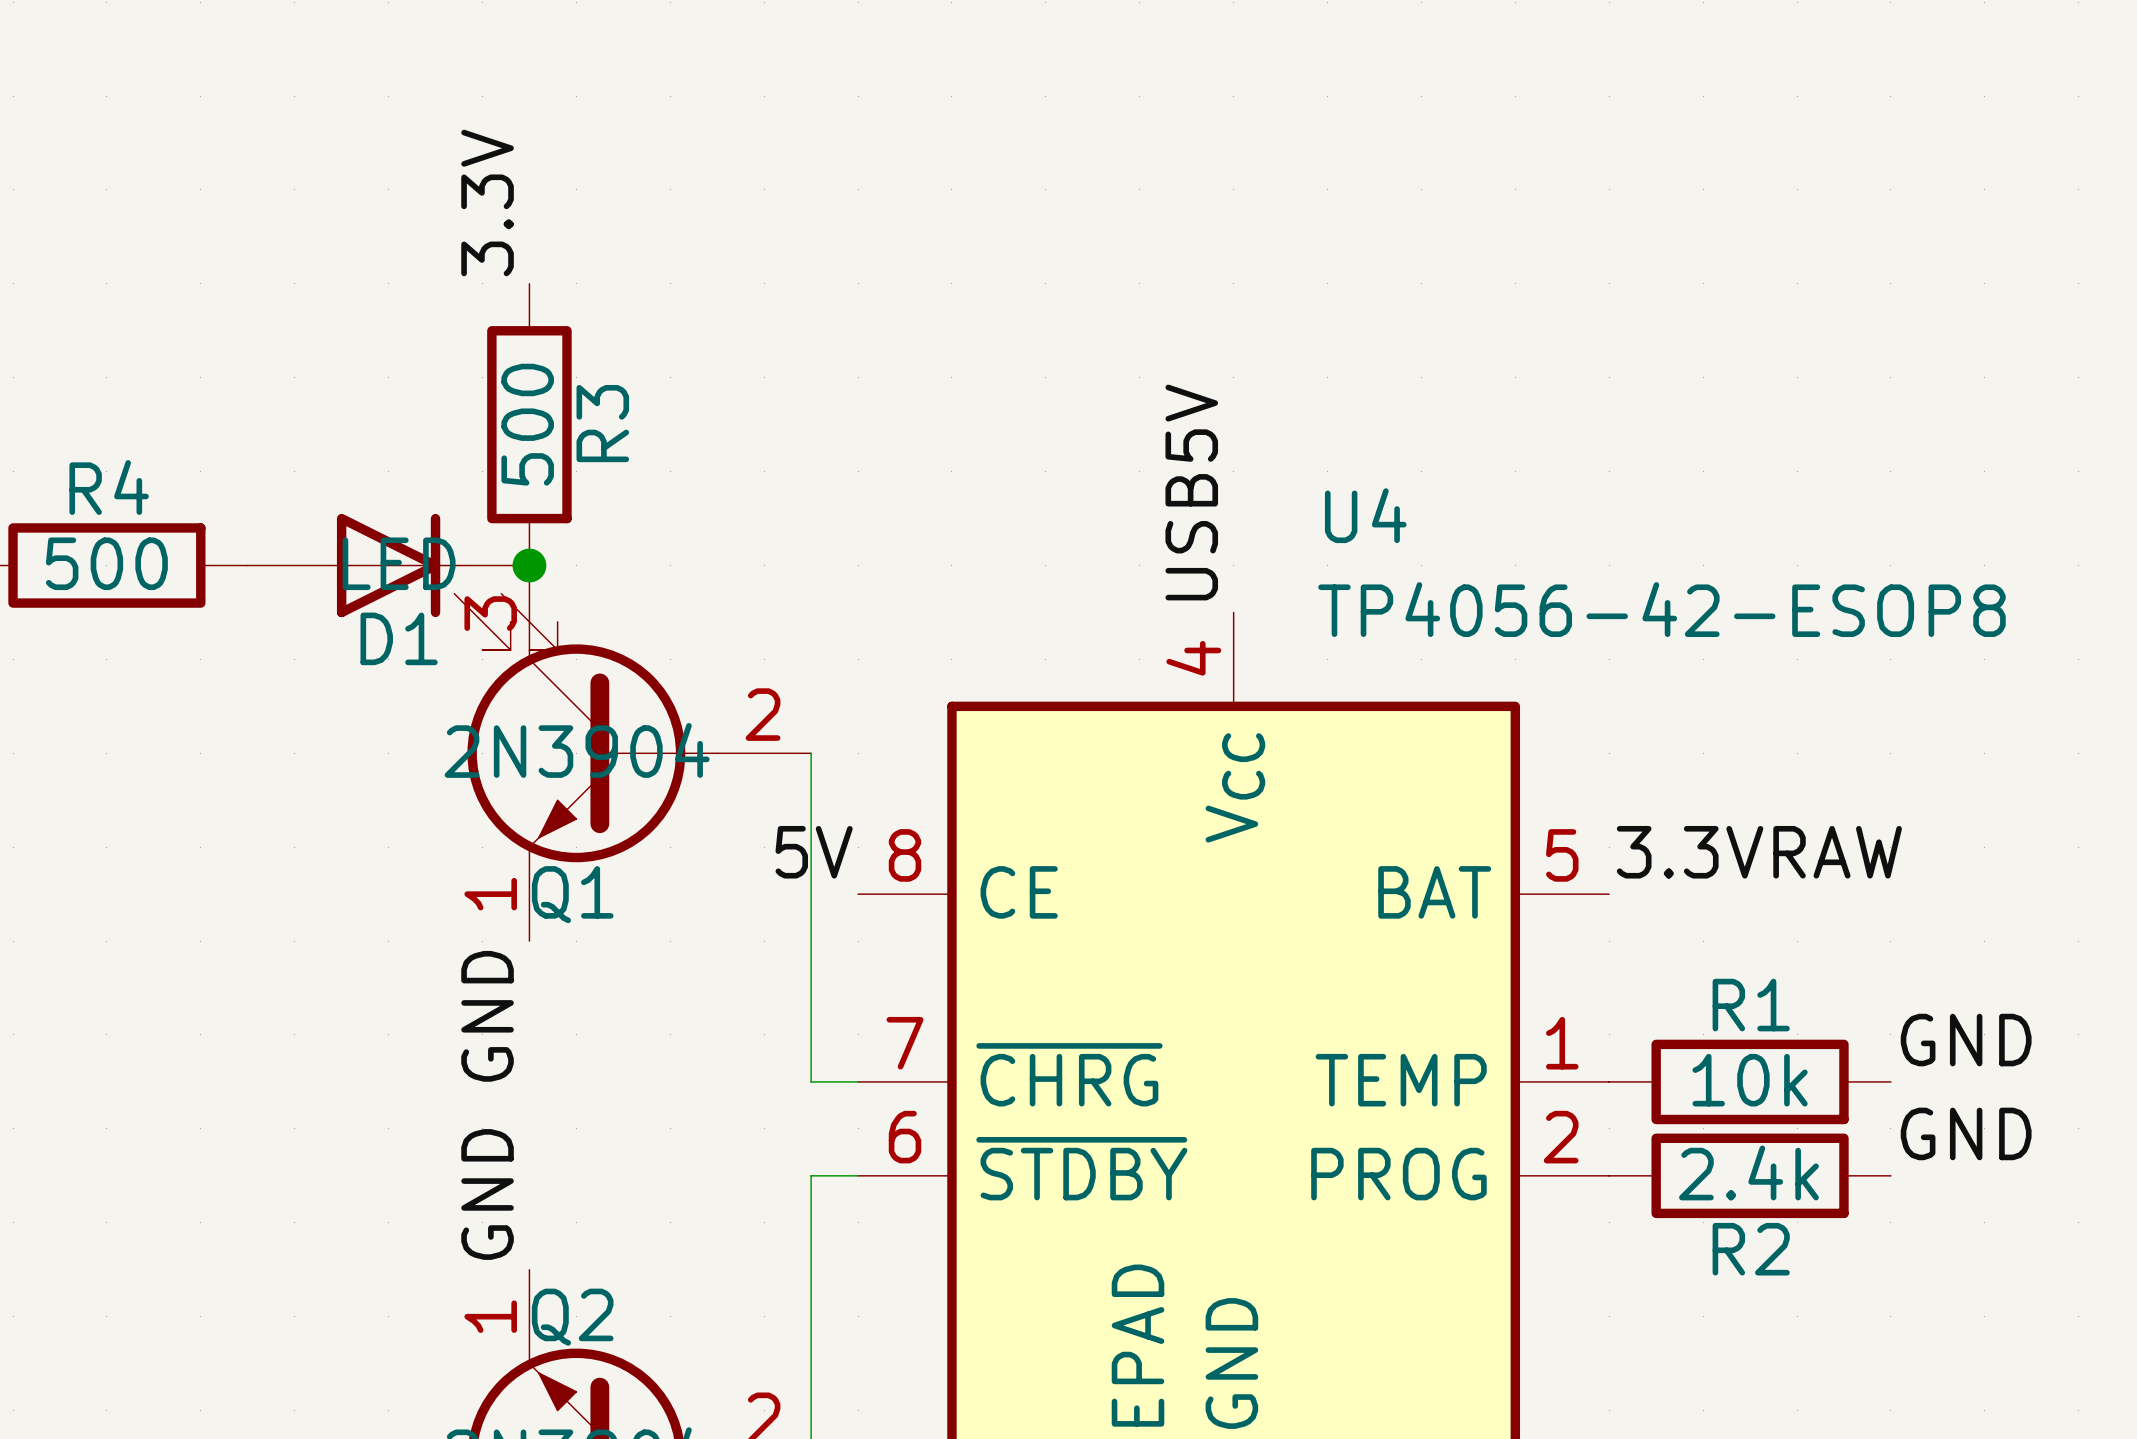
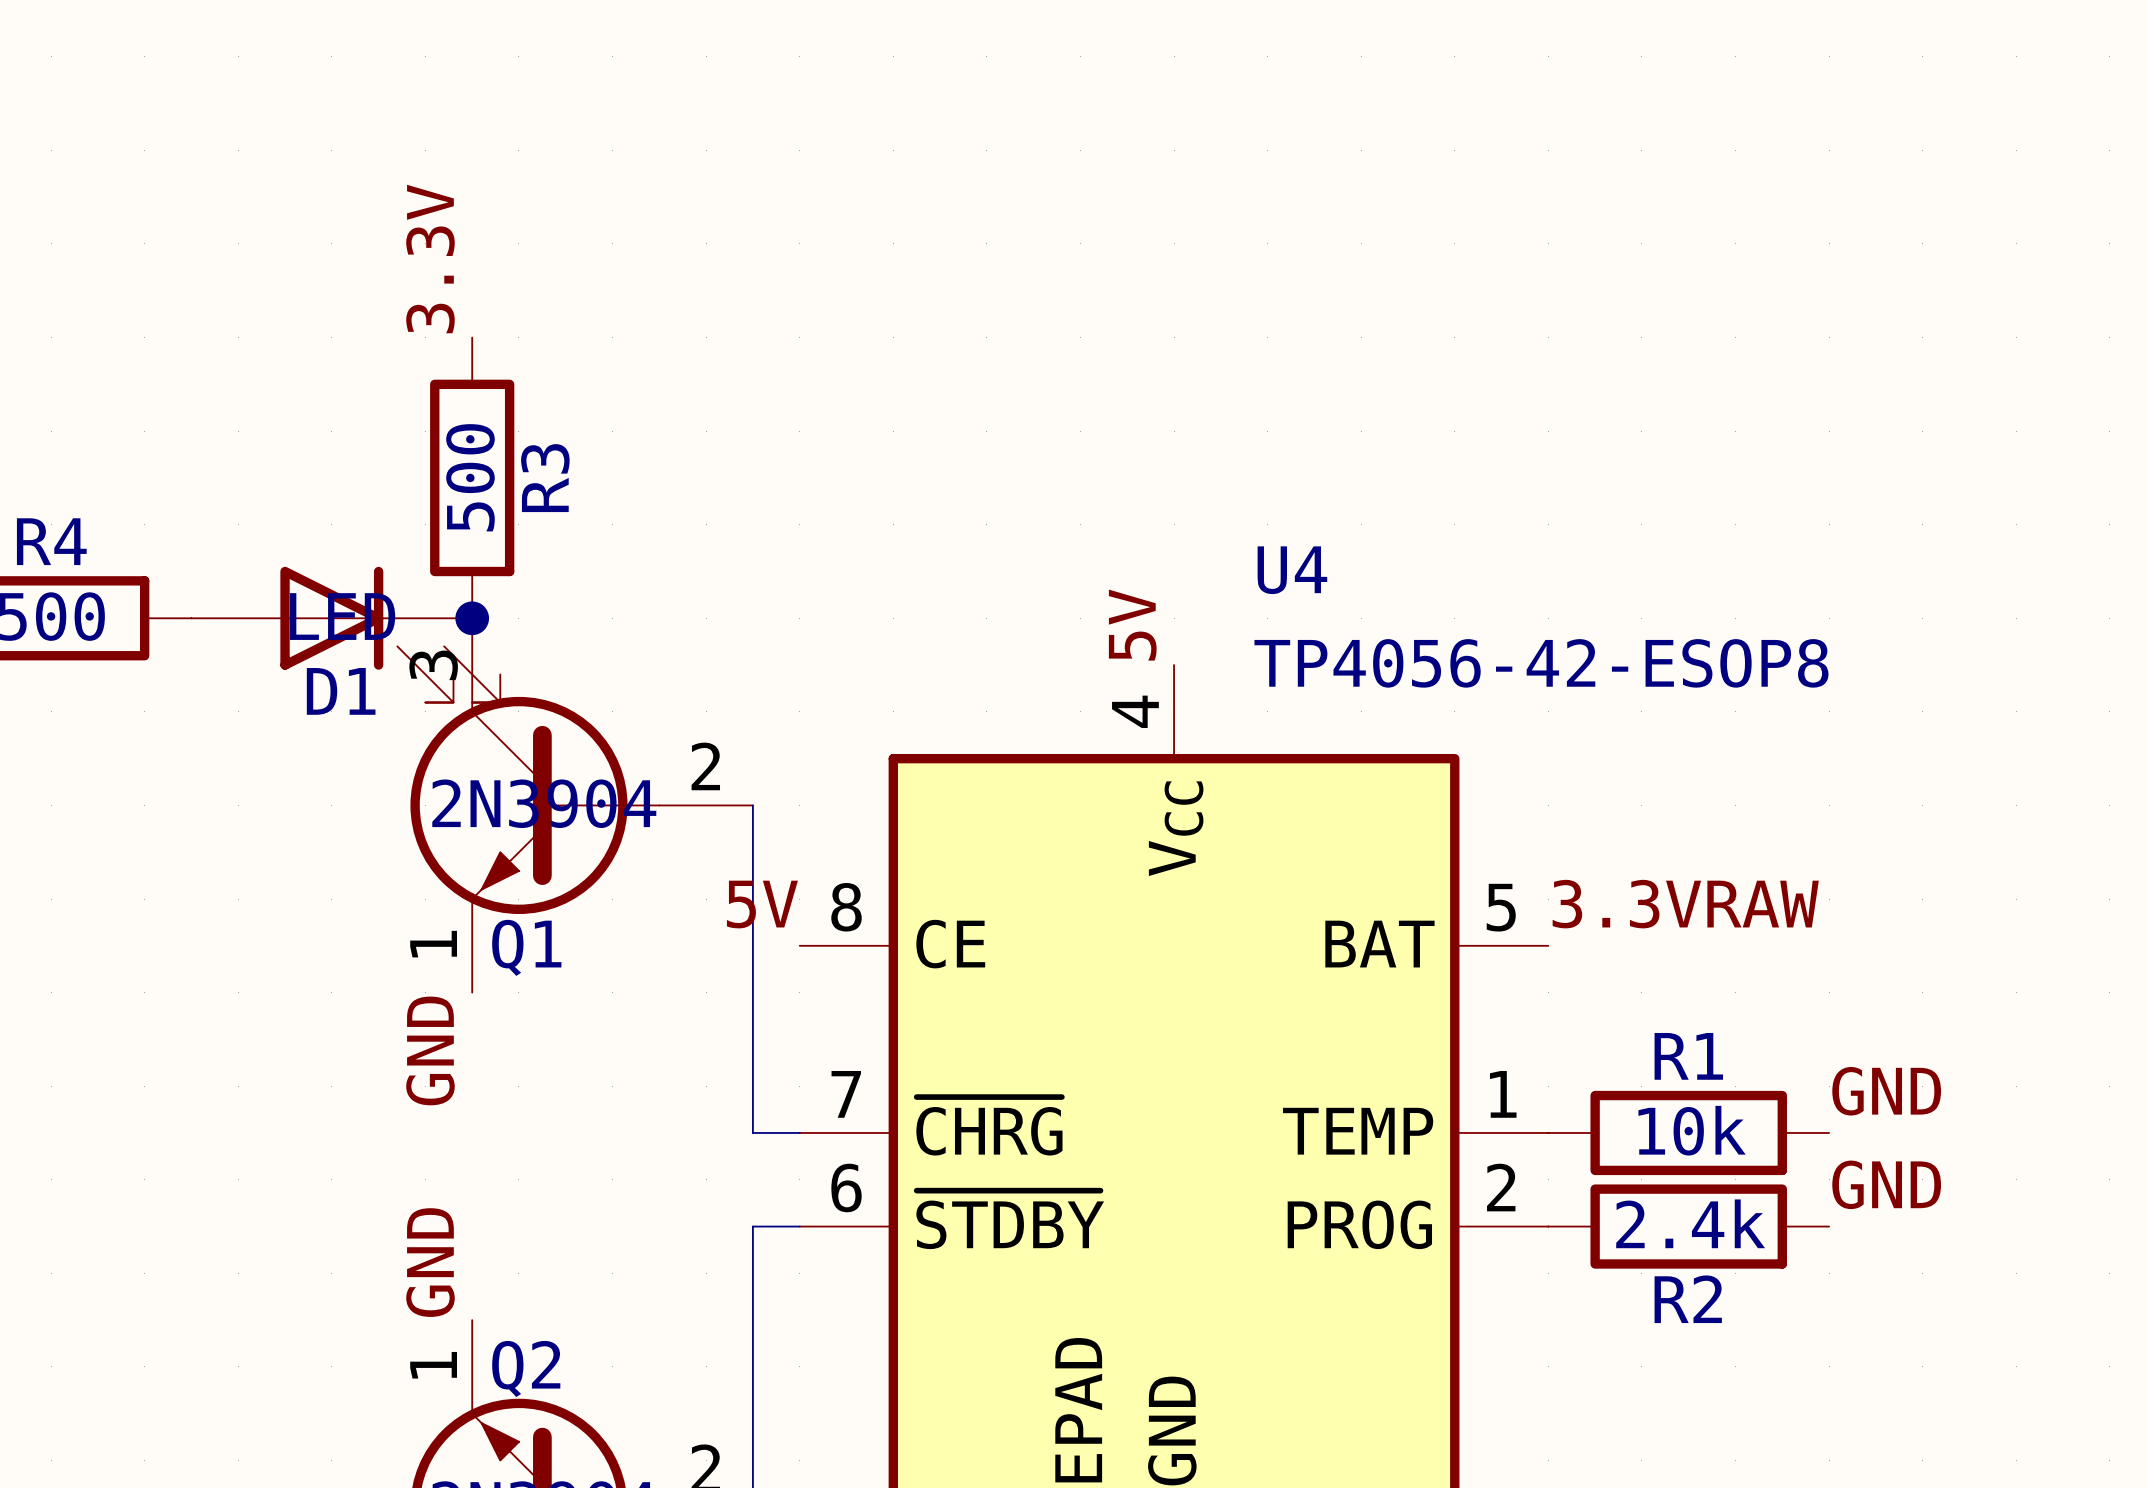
label: USB5V (1191, 492) -> 5V (1132, 625)

